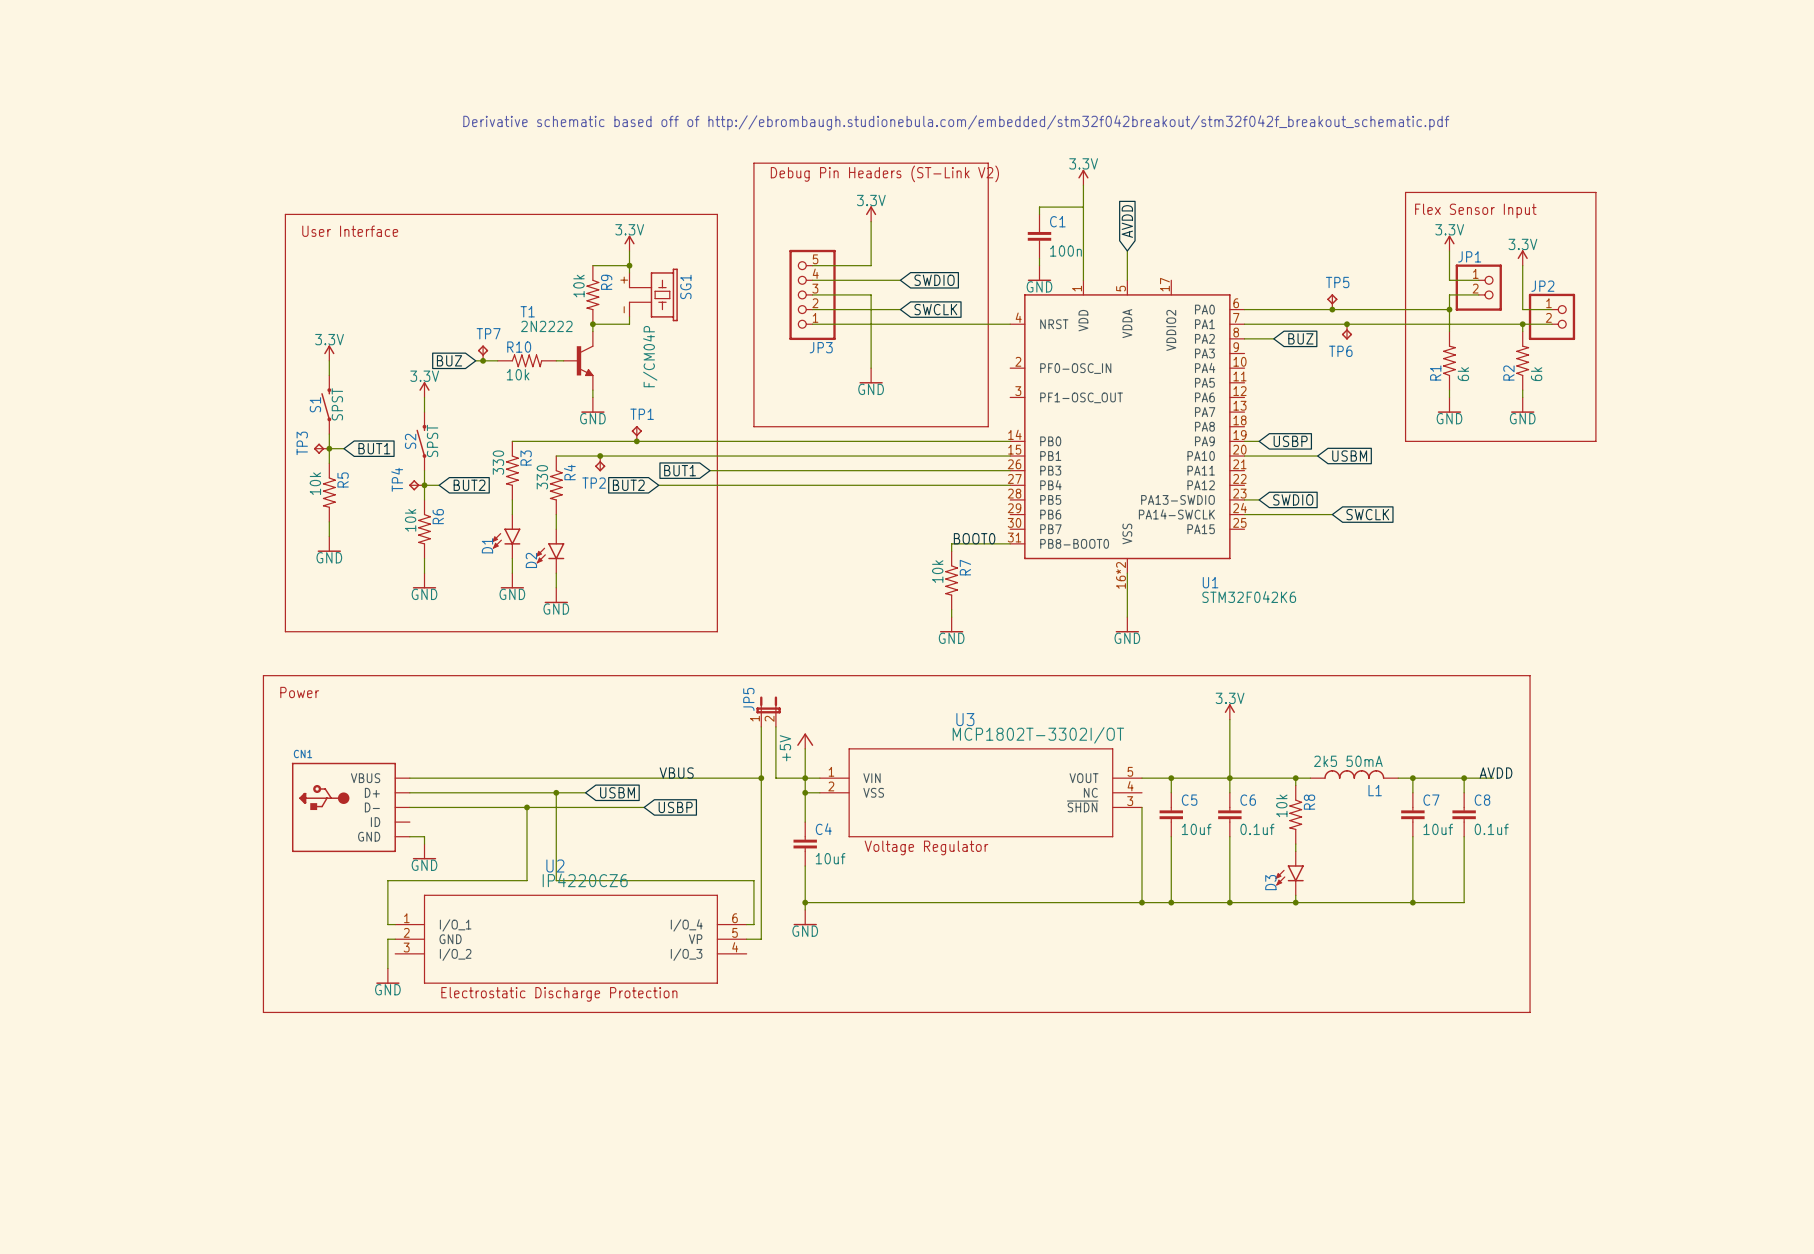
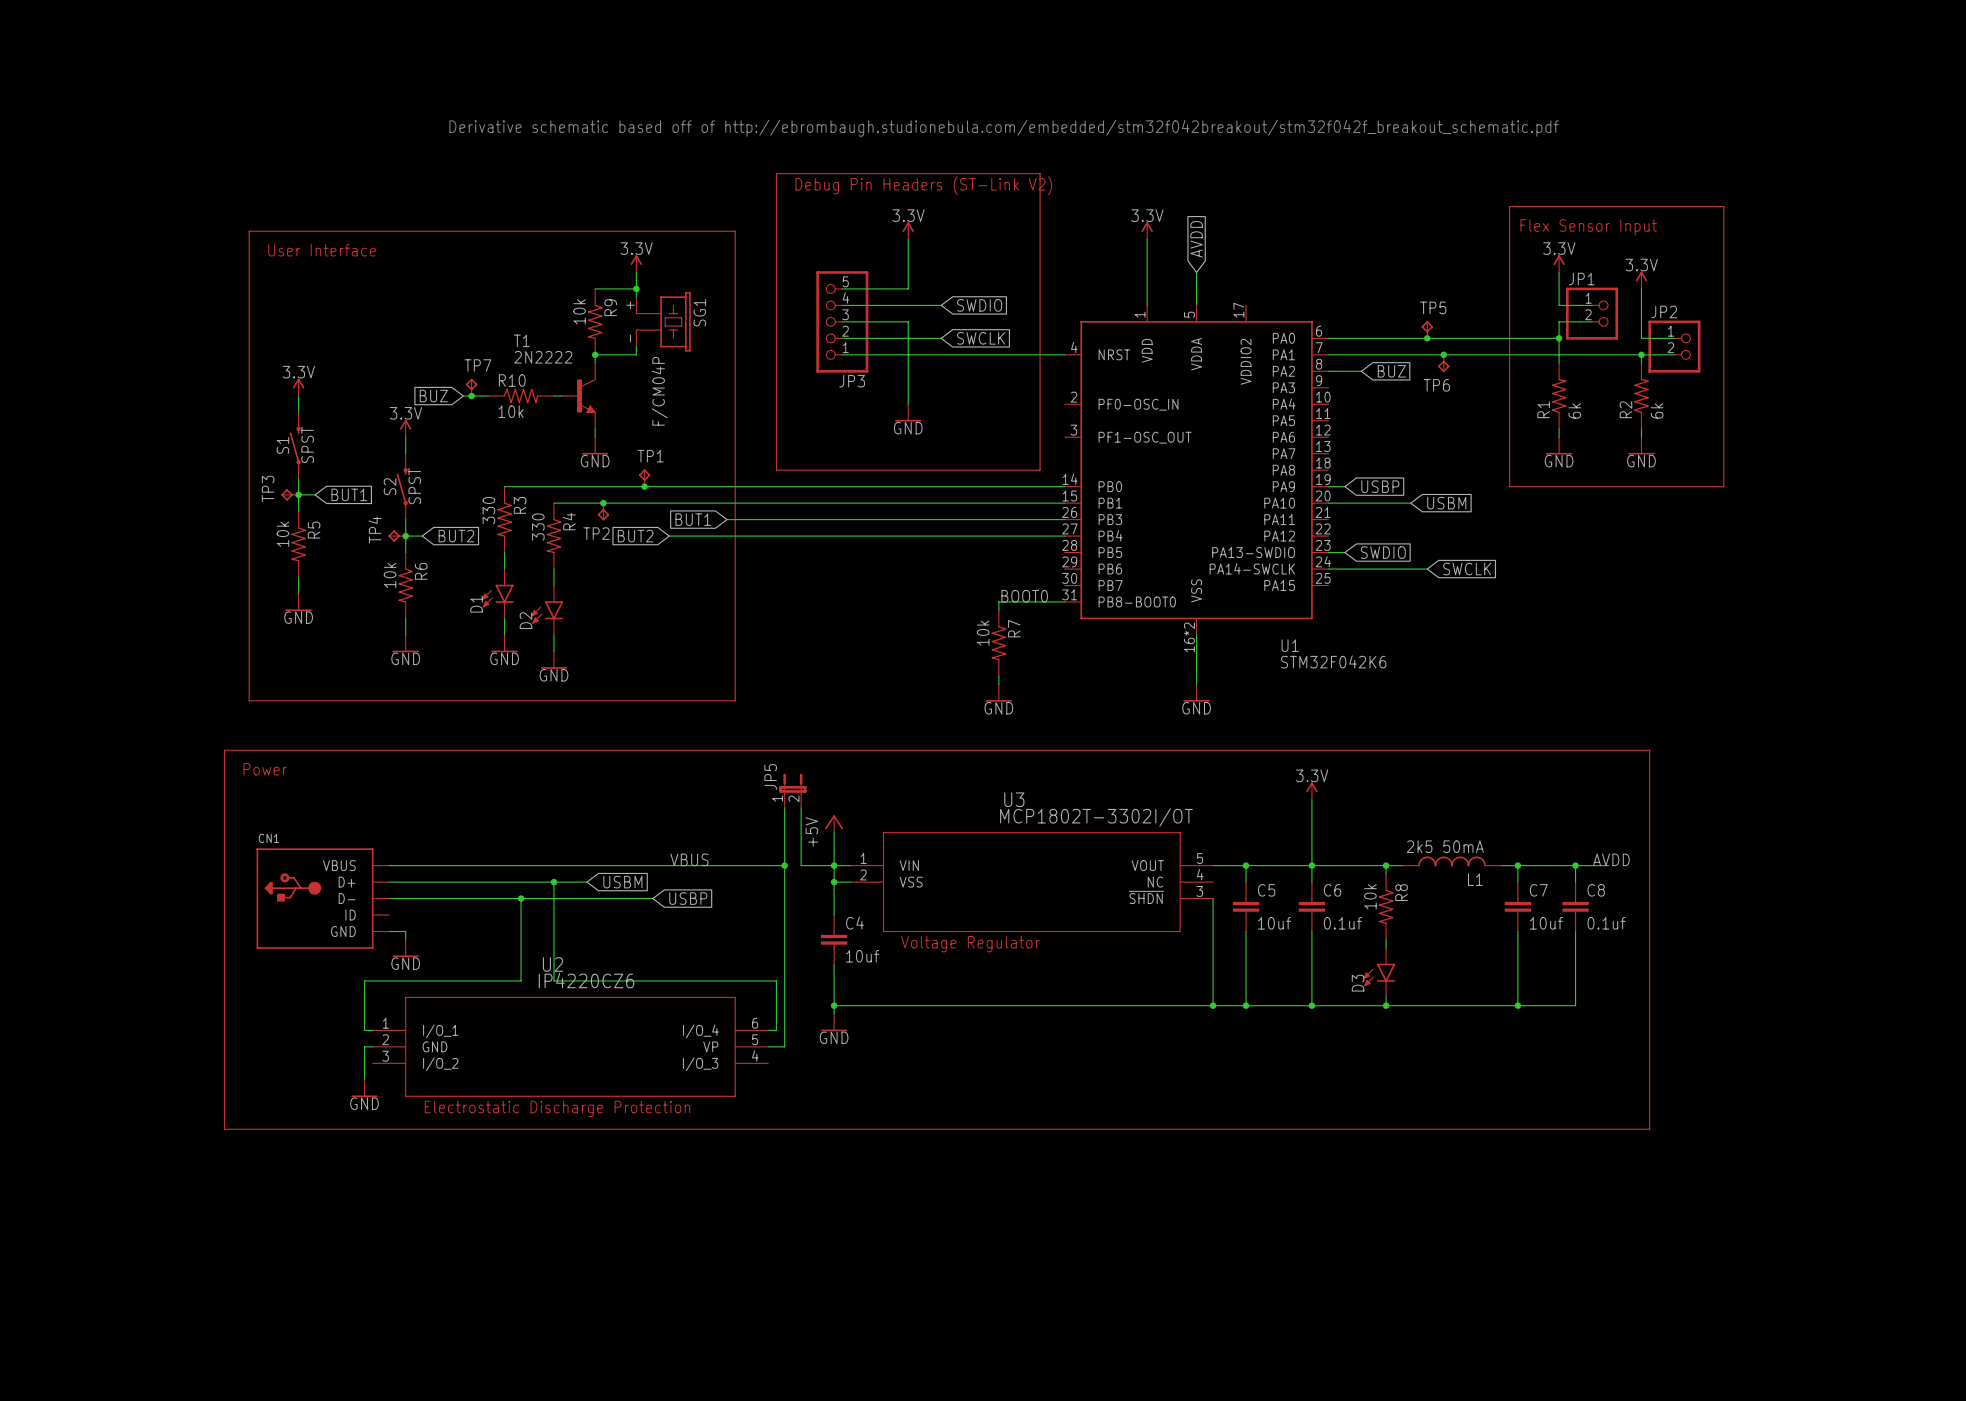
power symbol position: 3.3V (1083, 177) -> 3.3V (1147, 230)
wire: (1083, 185) (1083, 221) -> none
wire: (1083, 207) (1039, 207) (1039, 214) -> none
C1: 100n (1039, 236) -> none
wire: (1039, 258) (1039, 265) -> none
power symbol: GND (1039, 273) -> none

